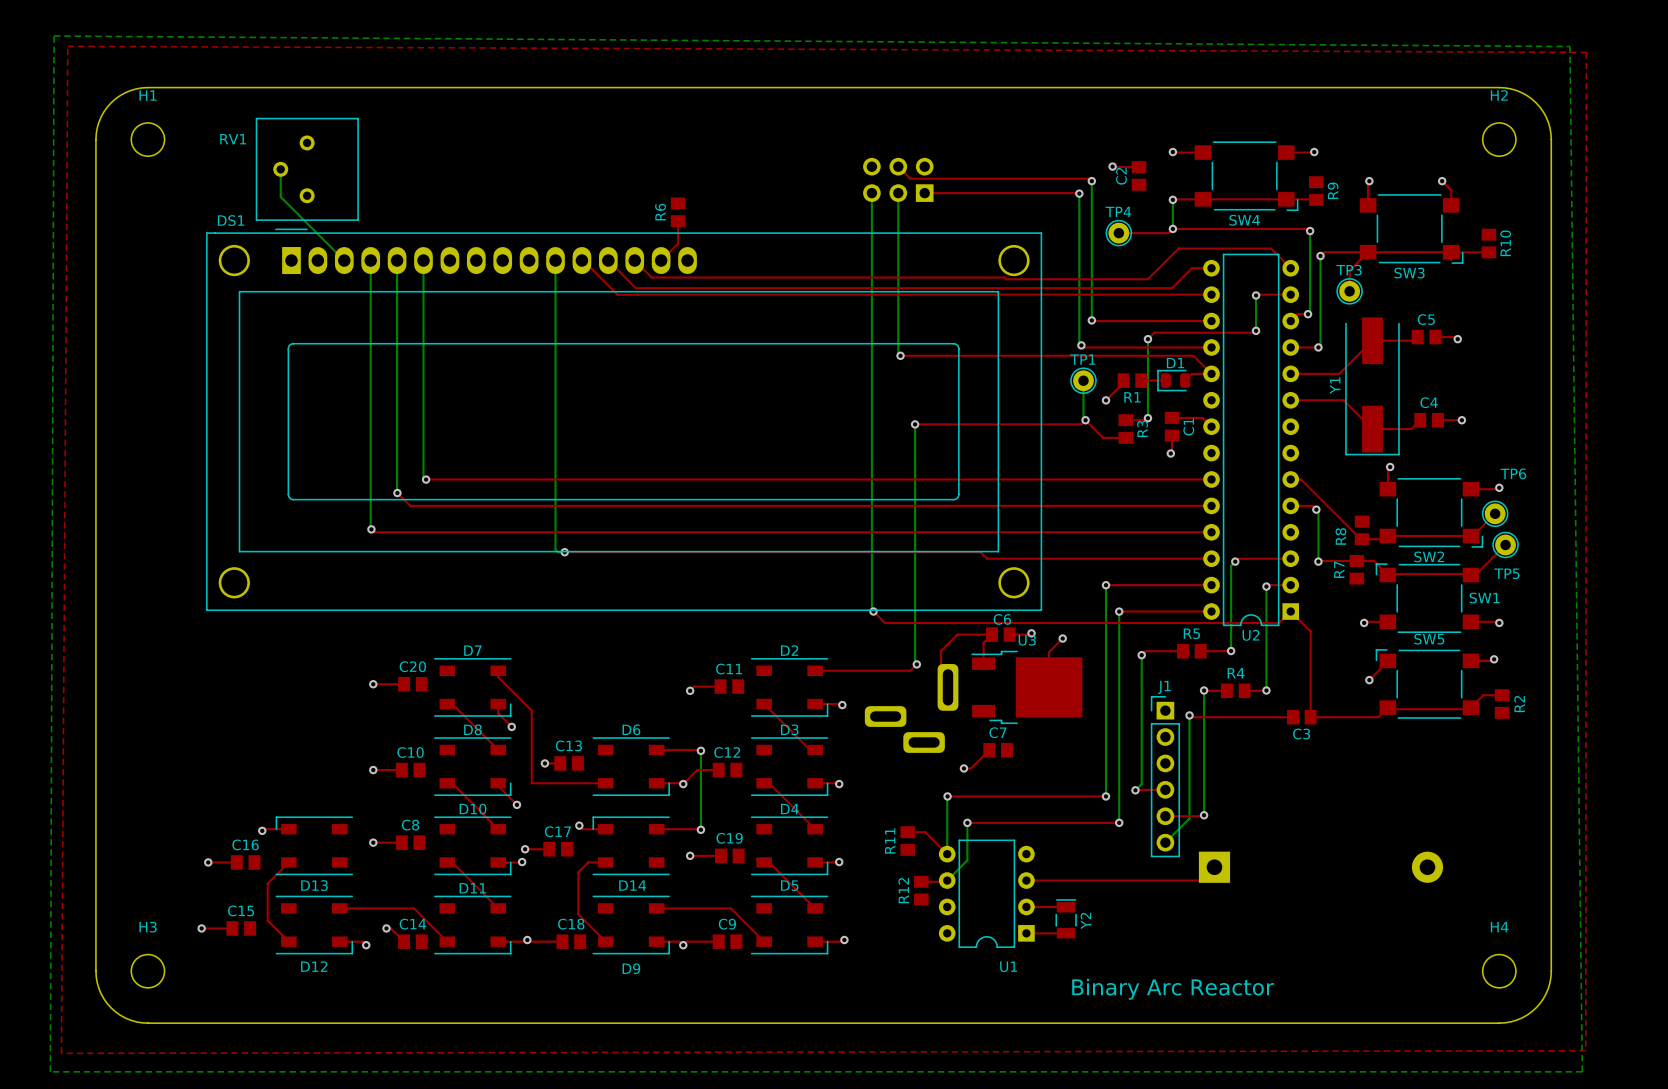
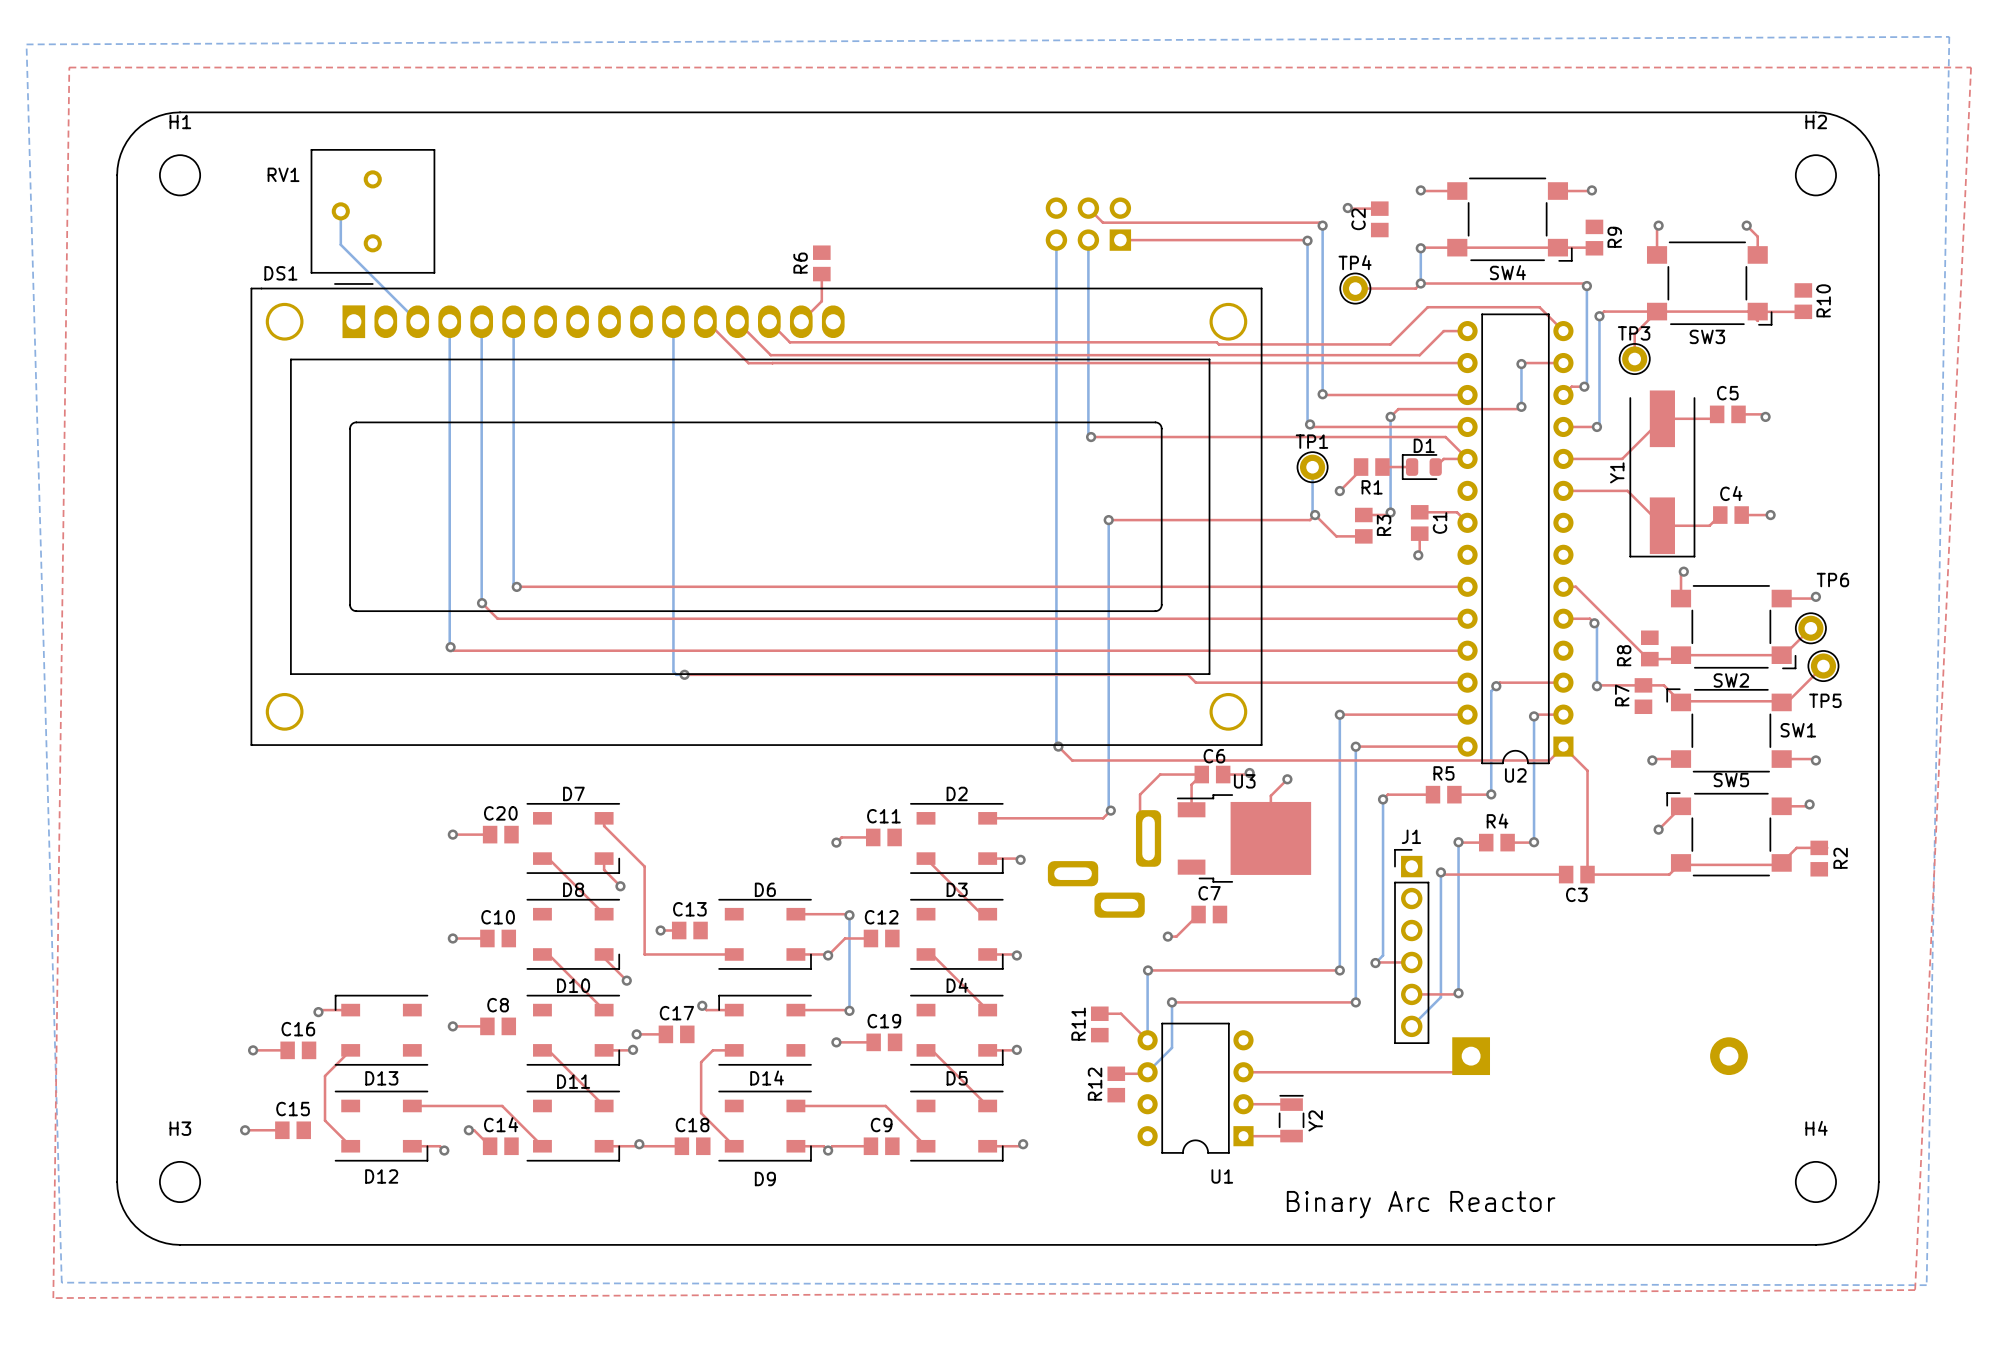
bottom zone outline: (54, 36) (50, 1071) (1582, 1071) (1569, 46) (54, 36) -> (1949, 36) (26, 44) (61, 1282) (1926, 1285) (1949, 36)
top zone outline: (67, 46) (61, 1053) (1585, 1050) (1586, 52) (67, 46) -> (69, 67) (53, 1298) (1915, 1290) (1971, 67) (69, 67)

